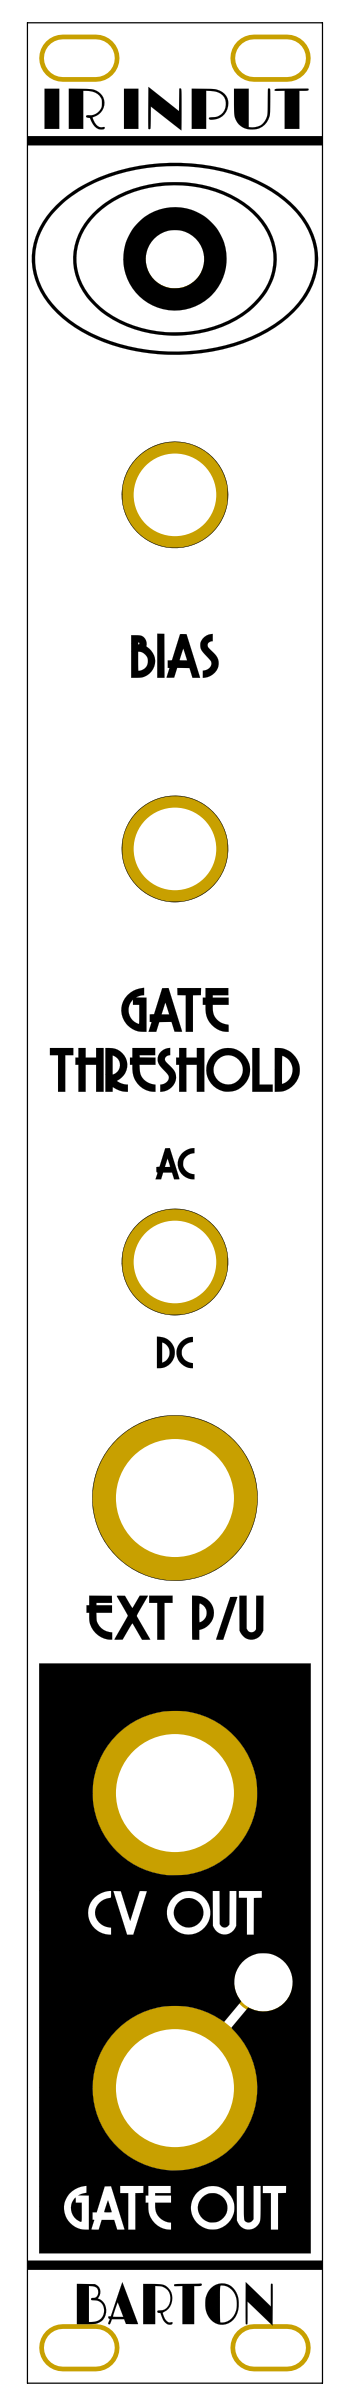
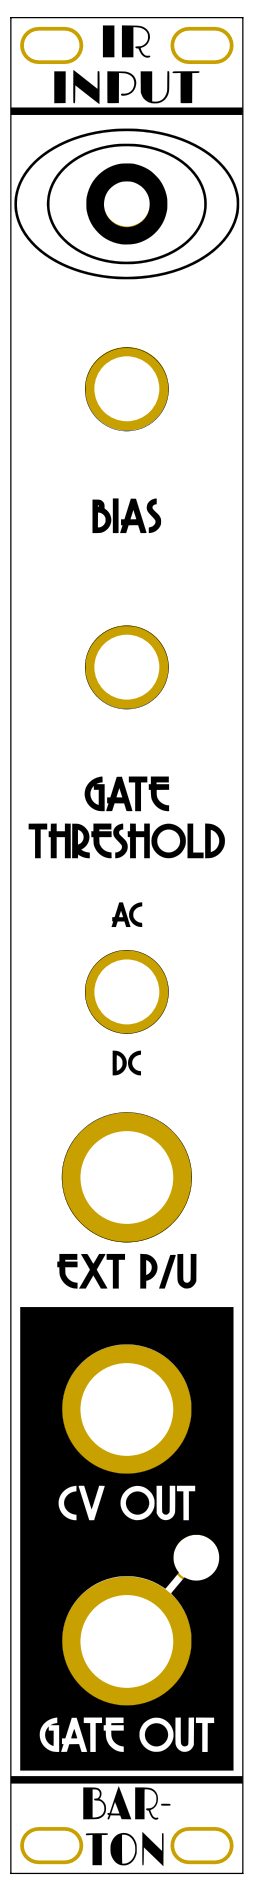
drawing shape: [27, 86, 323, 2326] -> [10, 25, 243, 1867]

